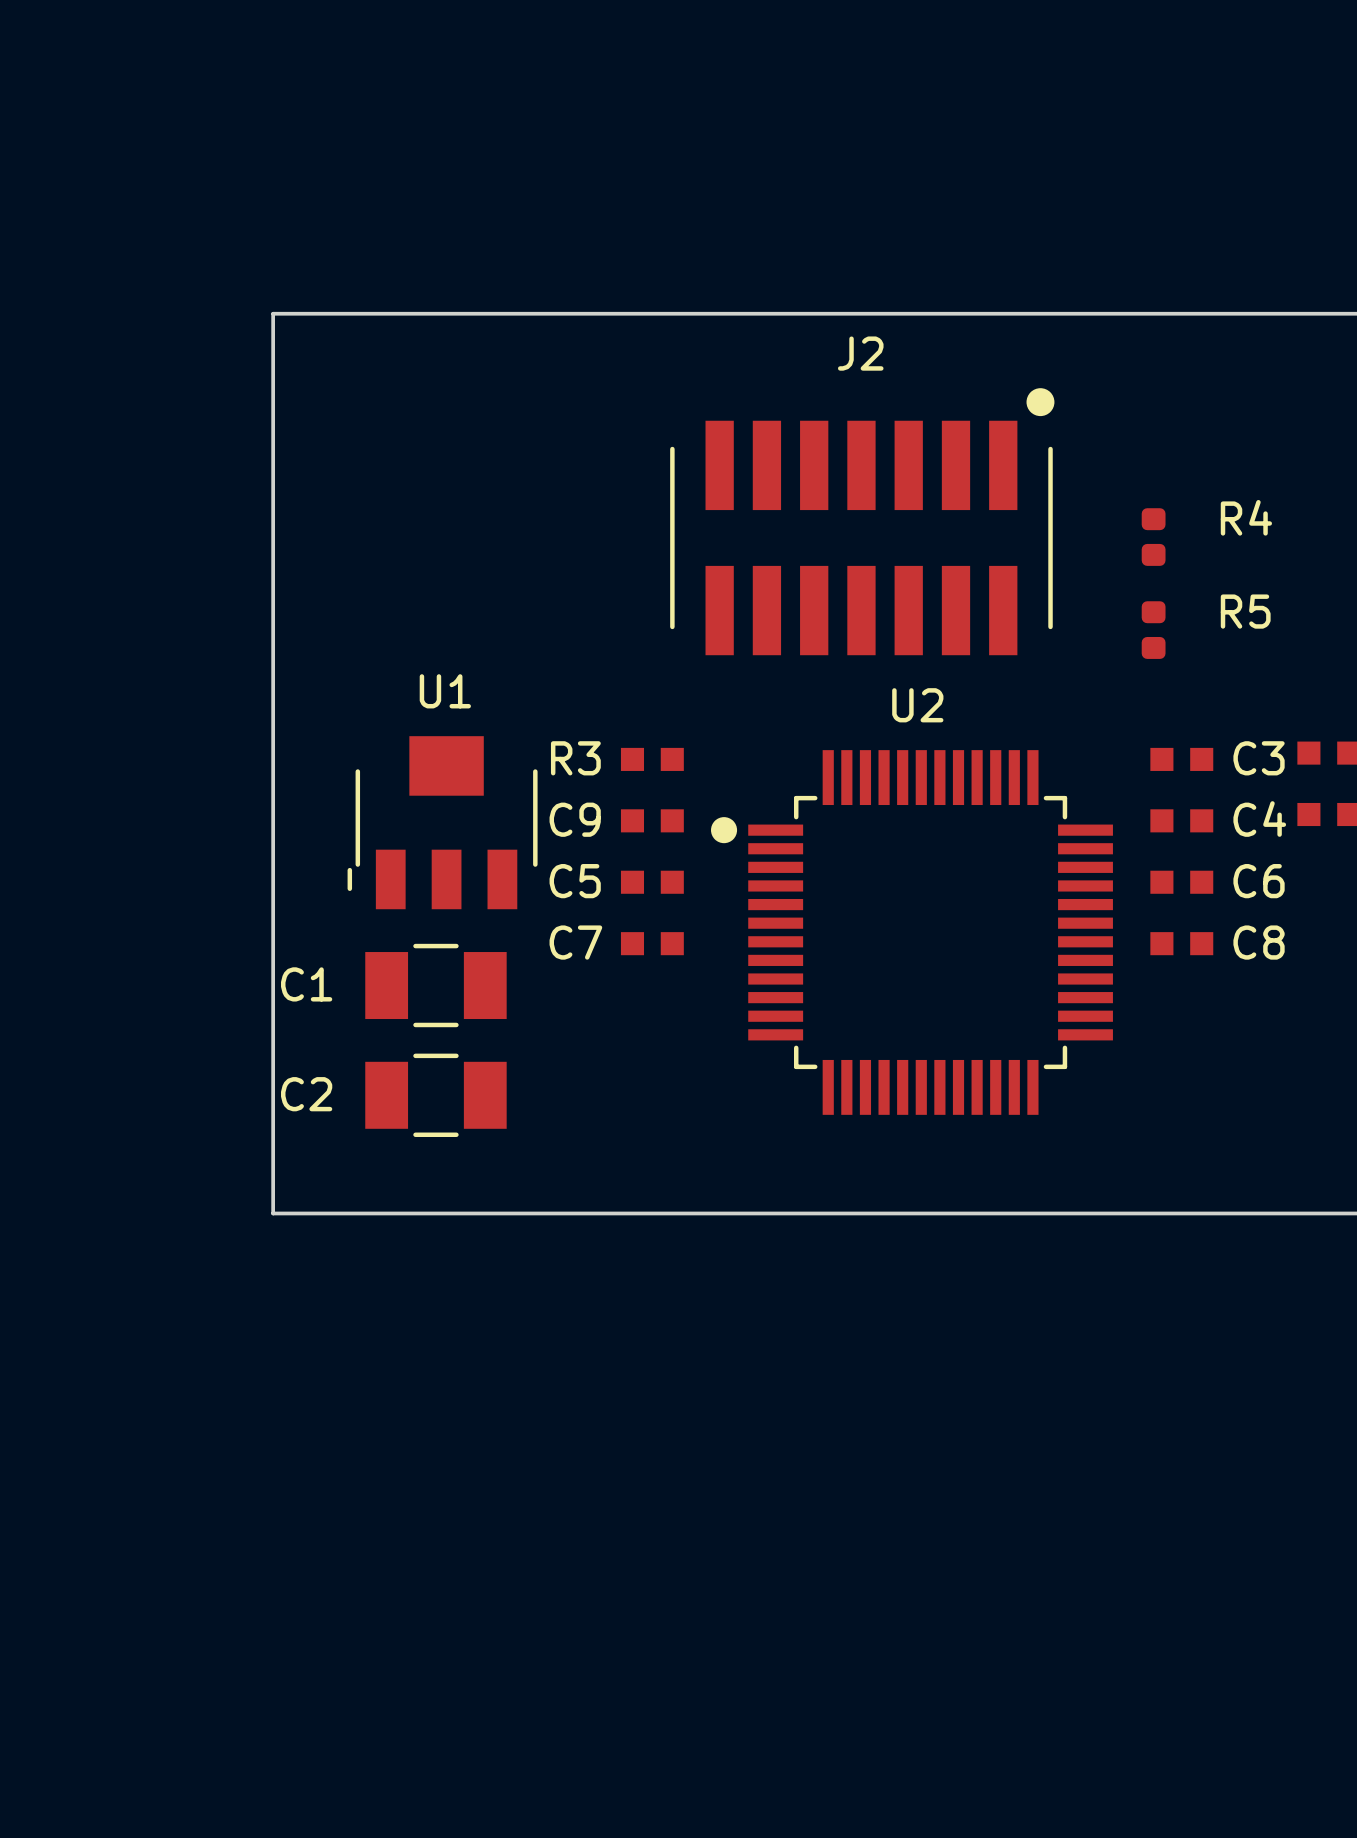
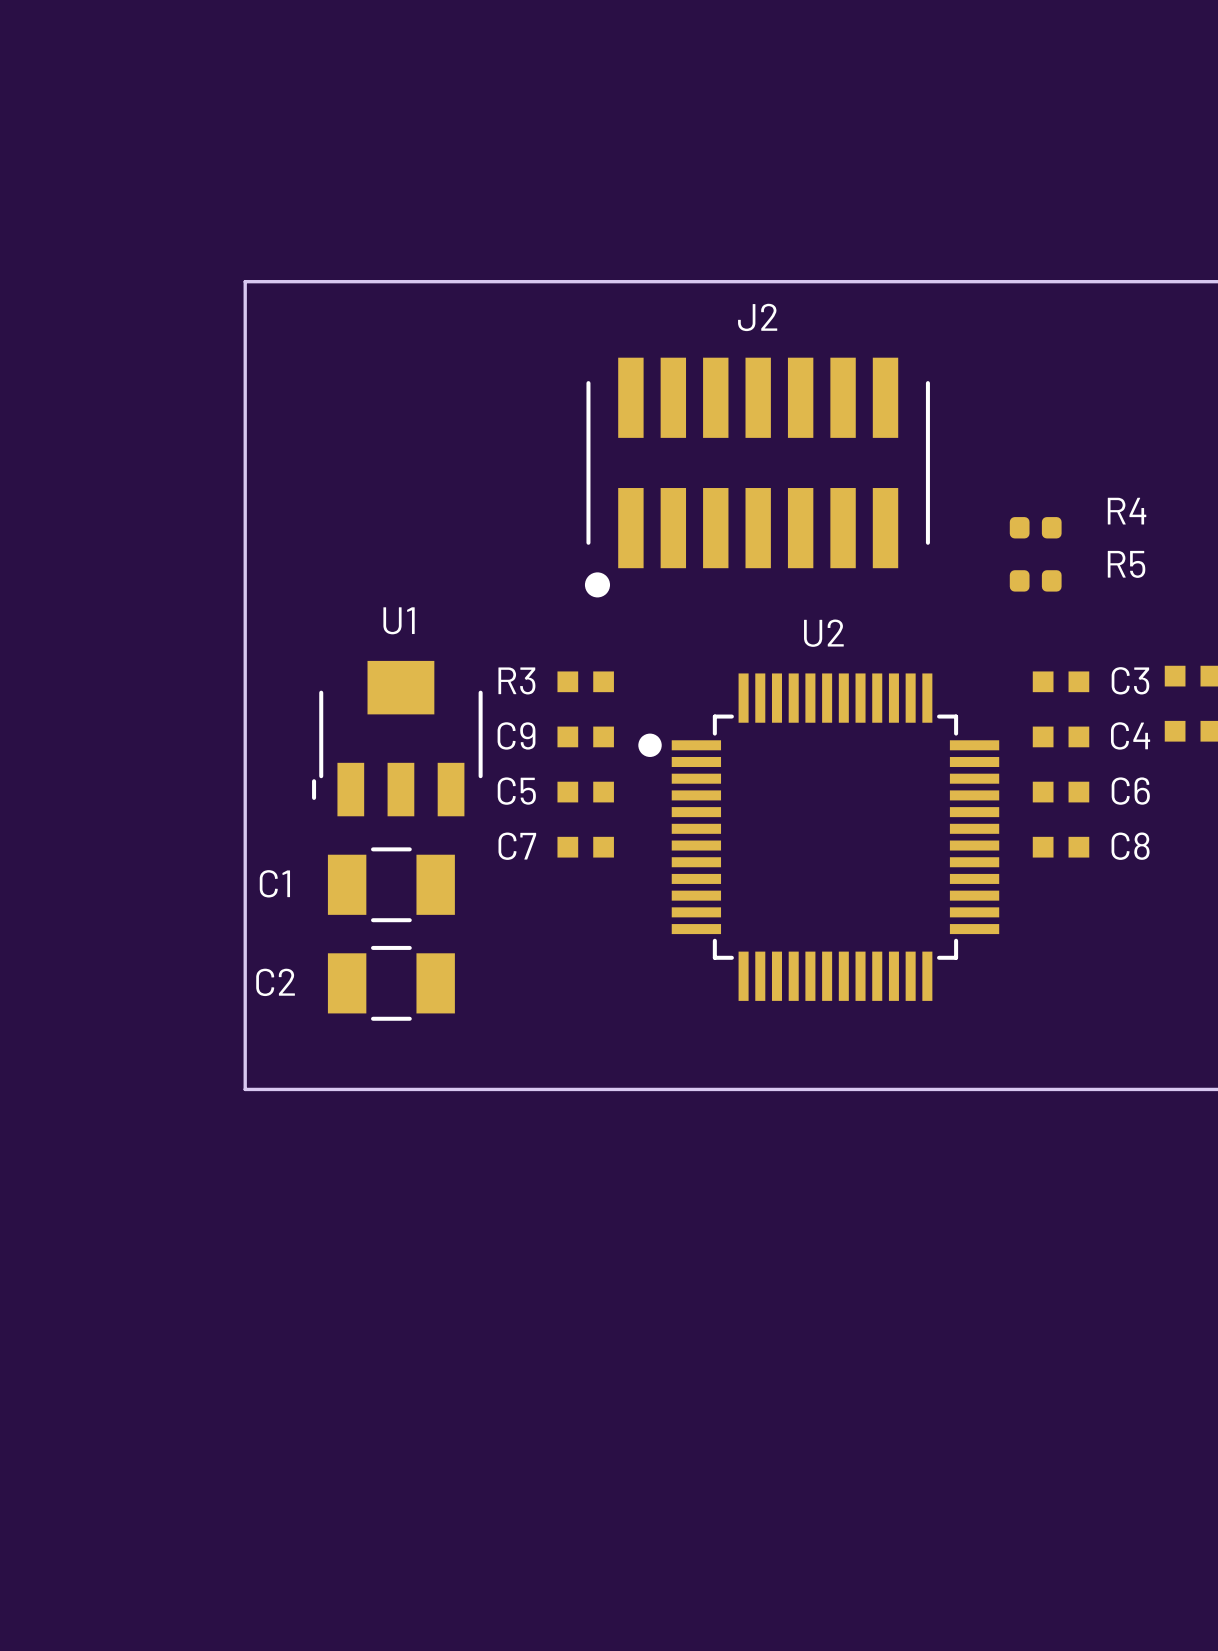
J2 rotation: 0° (862, 521) -> 180° (757, 477)
R4 rotation: 0° (1153, 537) -> 90° clockwise (1035, 527)
R4 position: (1153, 537) -> (1035, 527)
R5 rotation: 0° (1153, 630) -> 90° clockwise (1035, 580)

